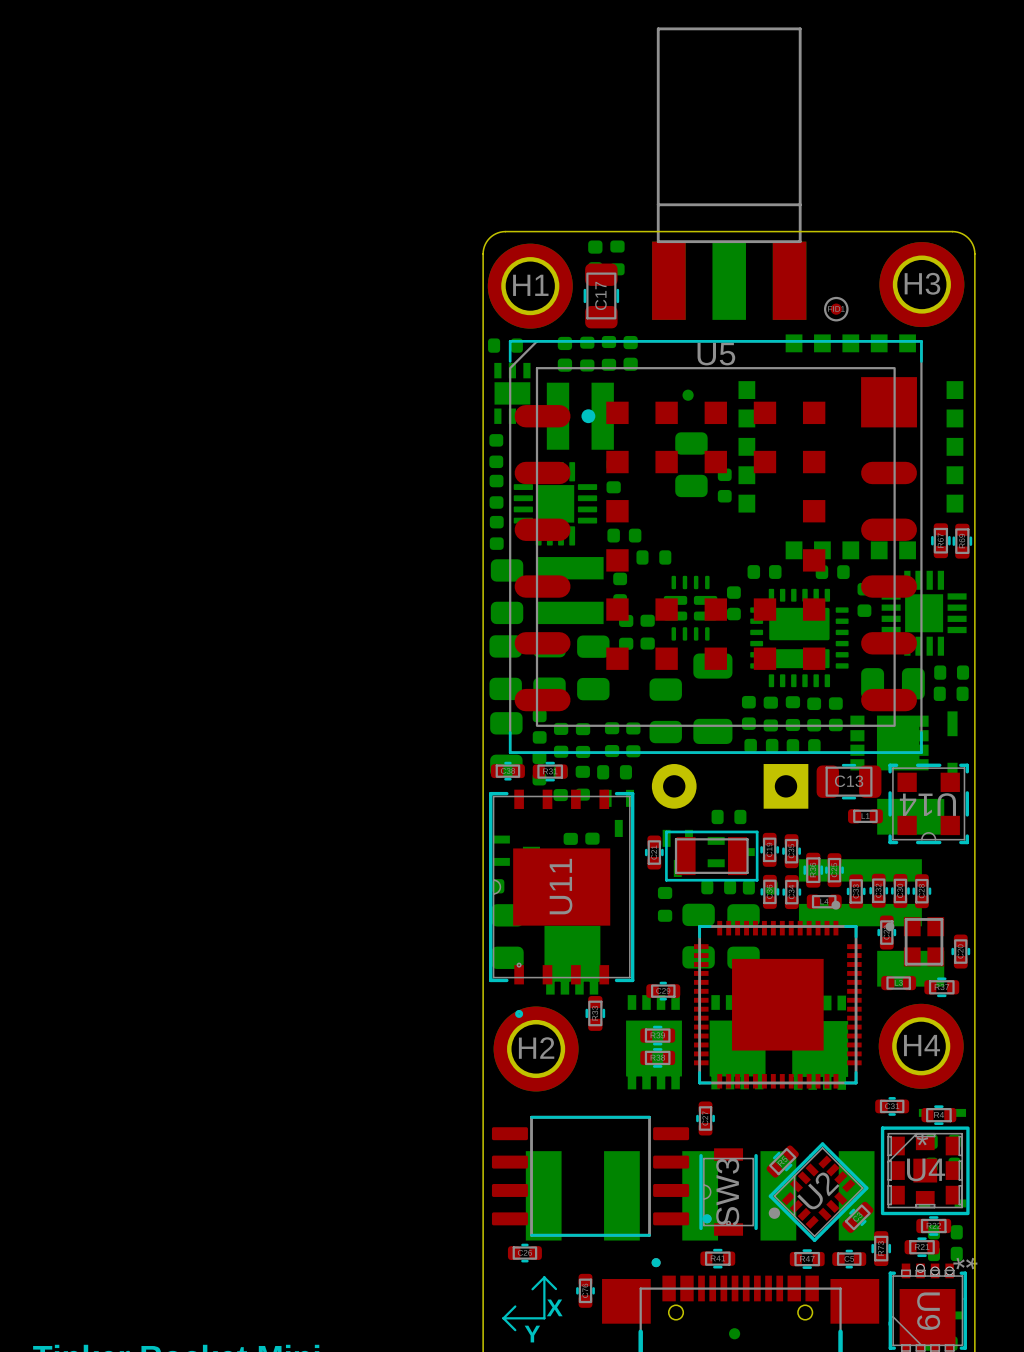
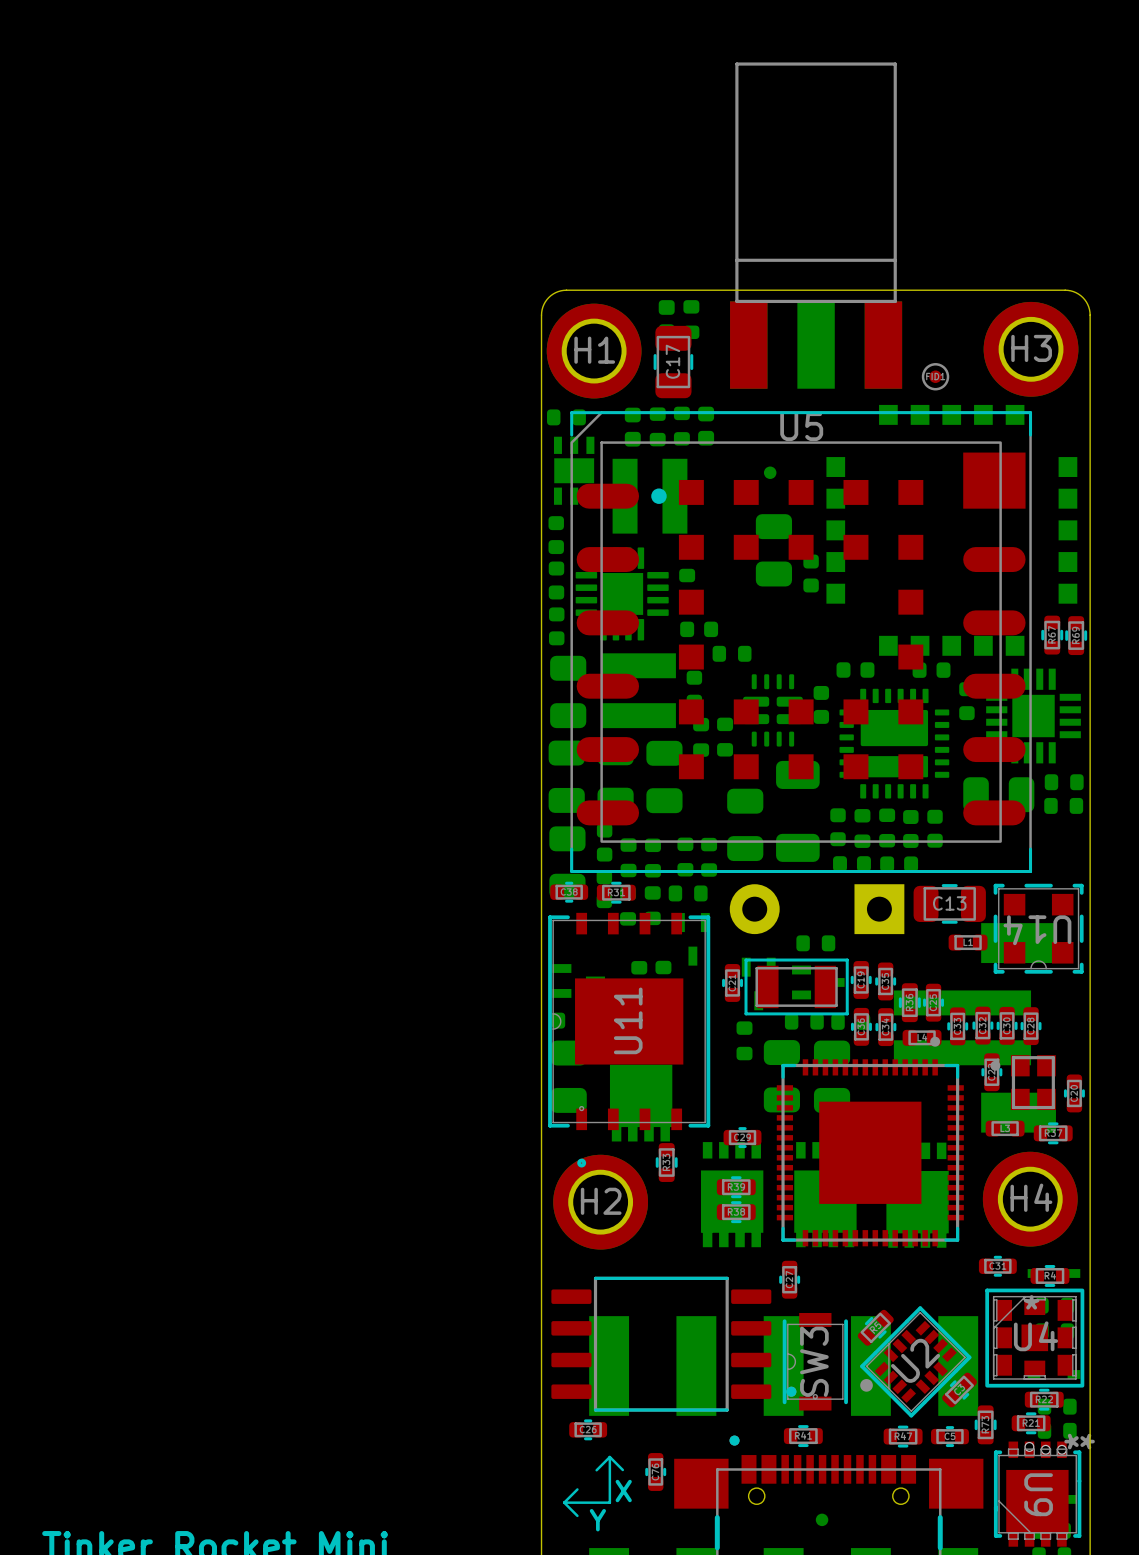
part: (889, 743) -> none
part: (952, 749) -> none

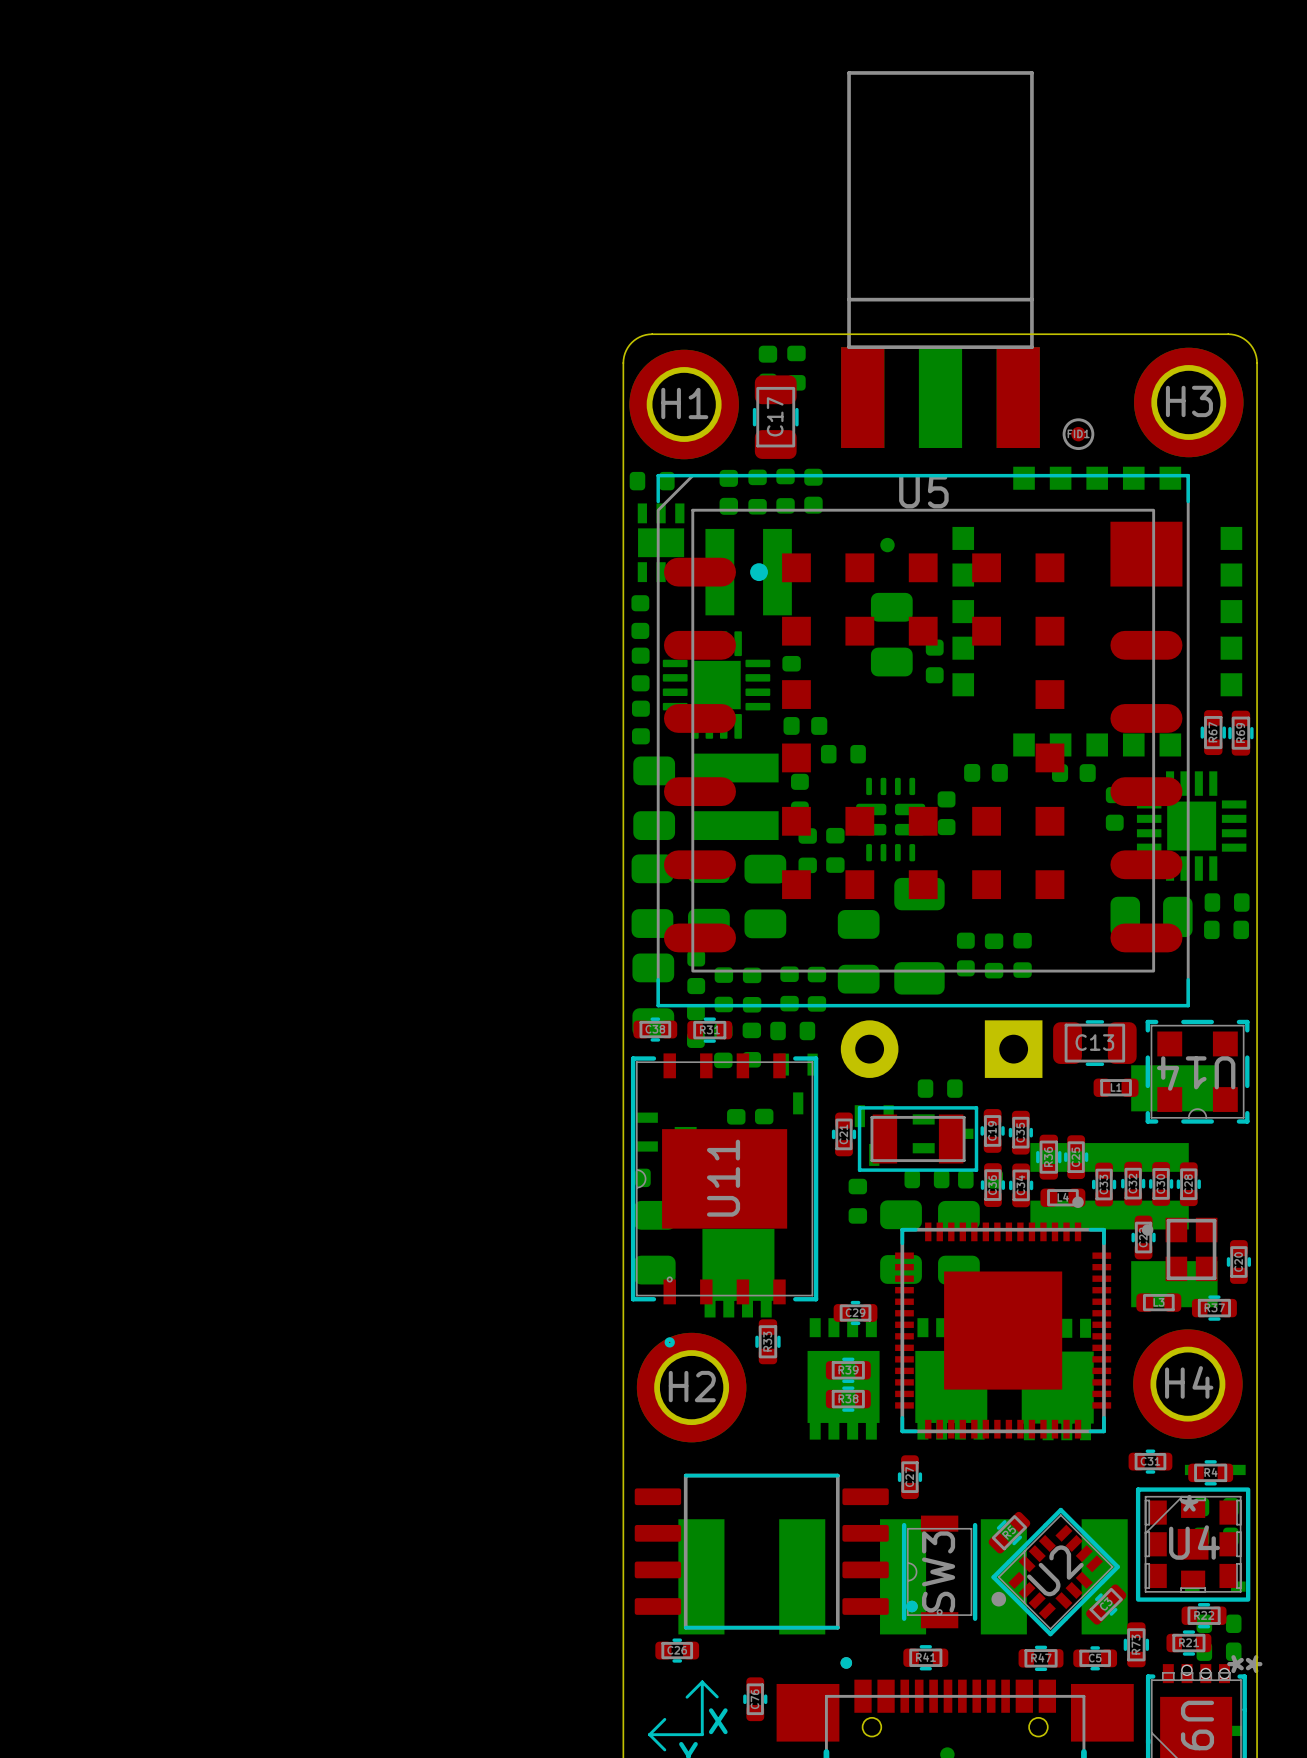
part: (894, 743) -> none
part: (910, 828) -> none
part: (935, 828) -> none
part: (851, 863) -> none
part: (899, 864) -> none

